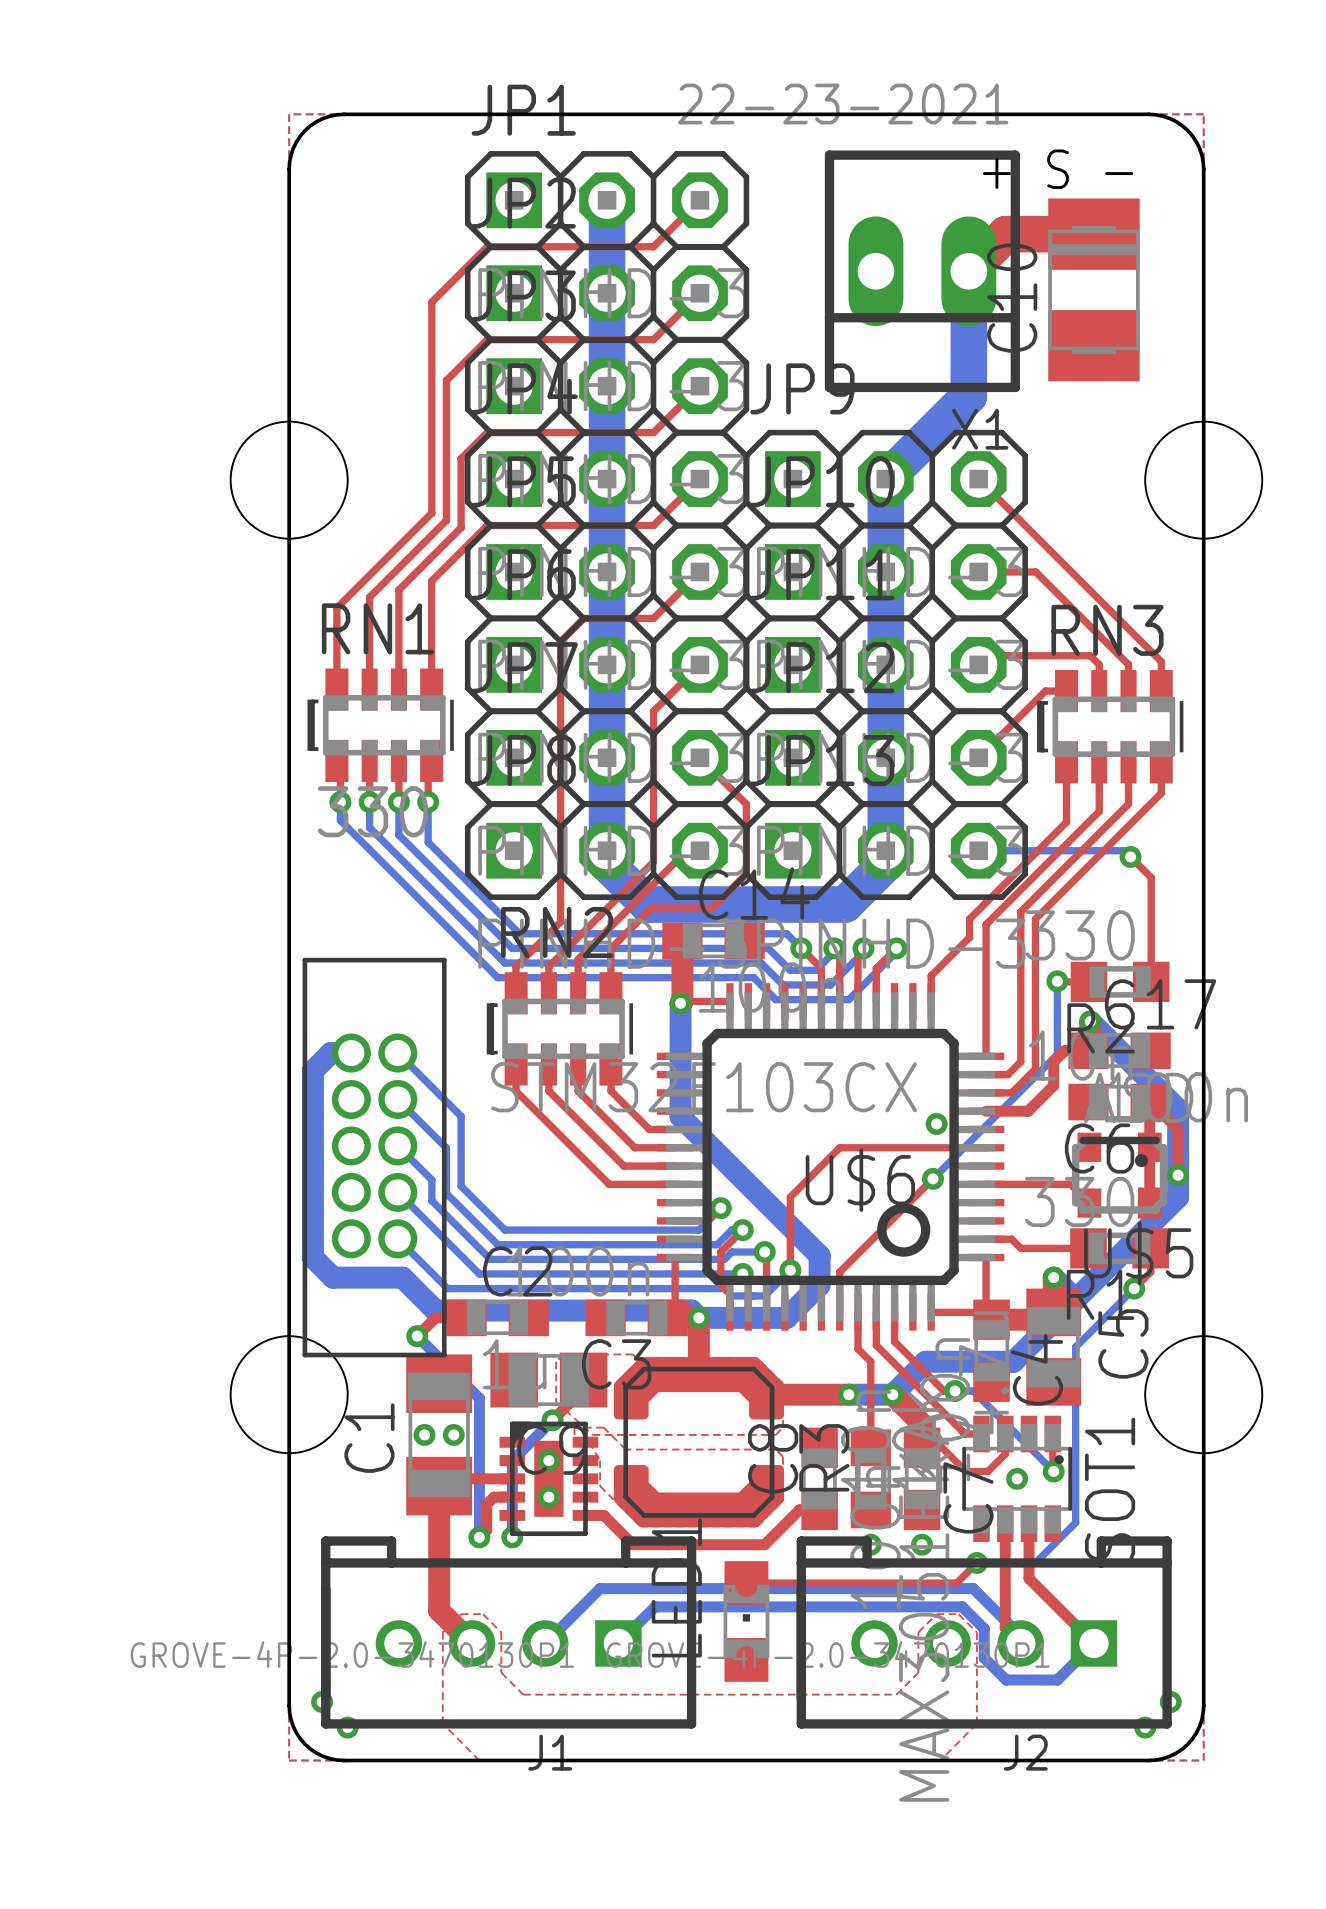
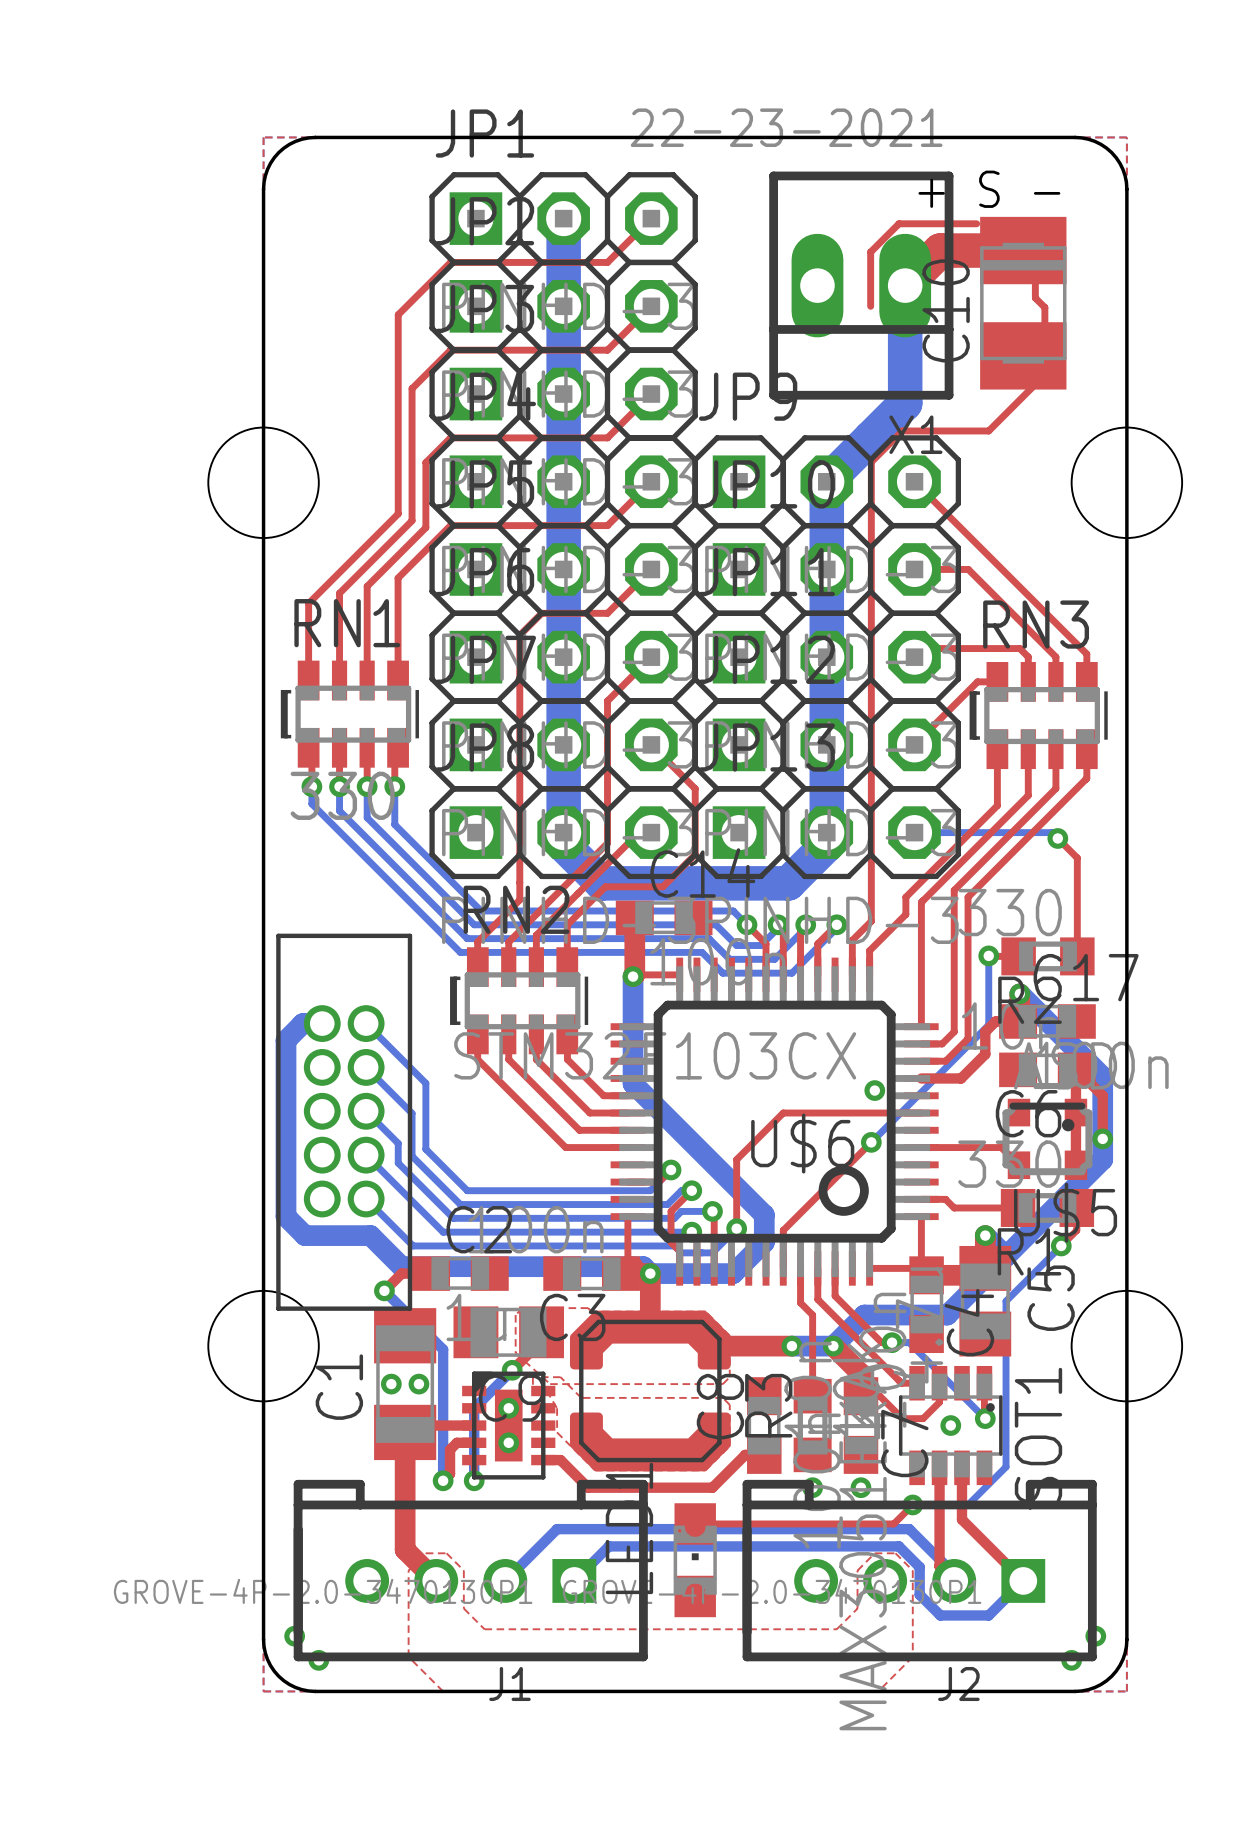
top track: none -> (976, 223) (898, 223) (870, 252) (870, 306)
top track: none -> (1035, 223) (1035, 298) (1044, 307) (1044, 374) (988, 430) (902, 430) (871, 462) (871, 921) (852, 940) (852, 974)

